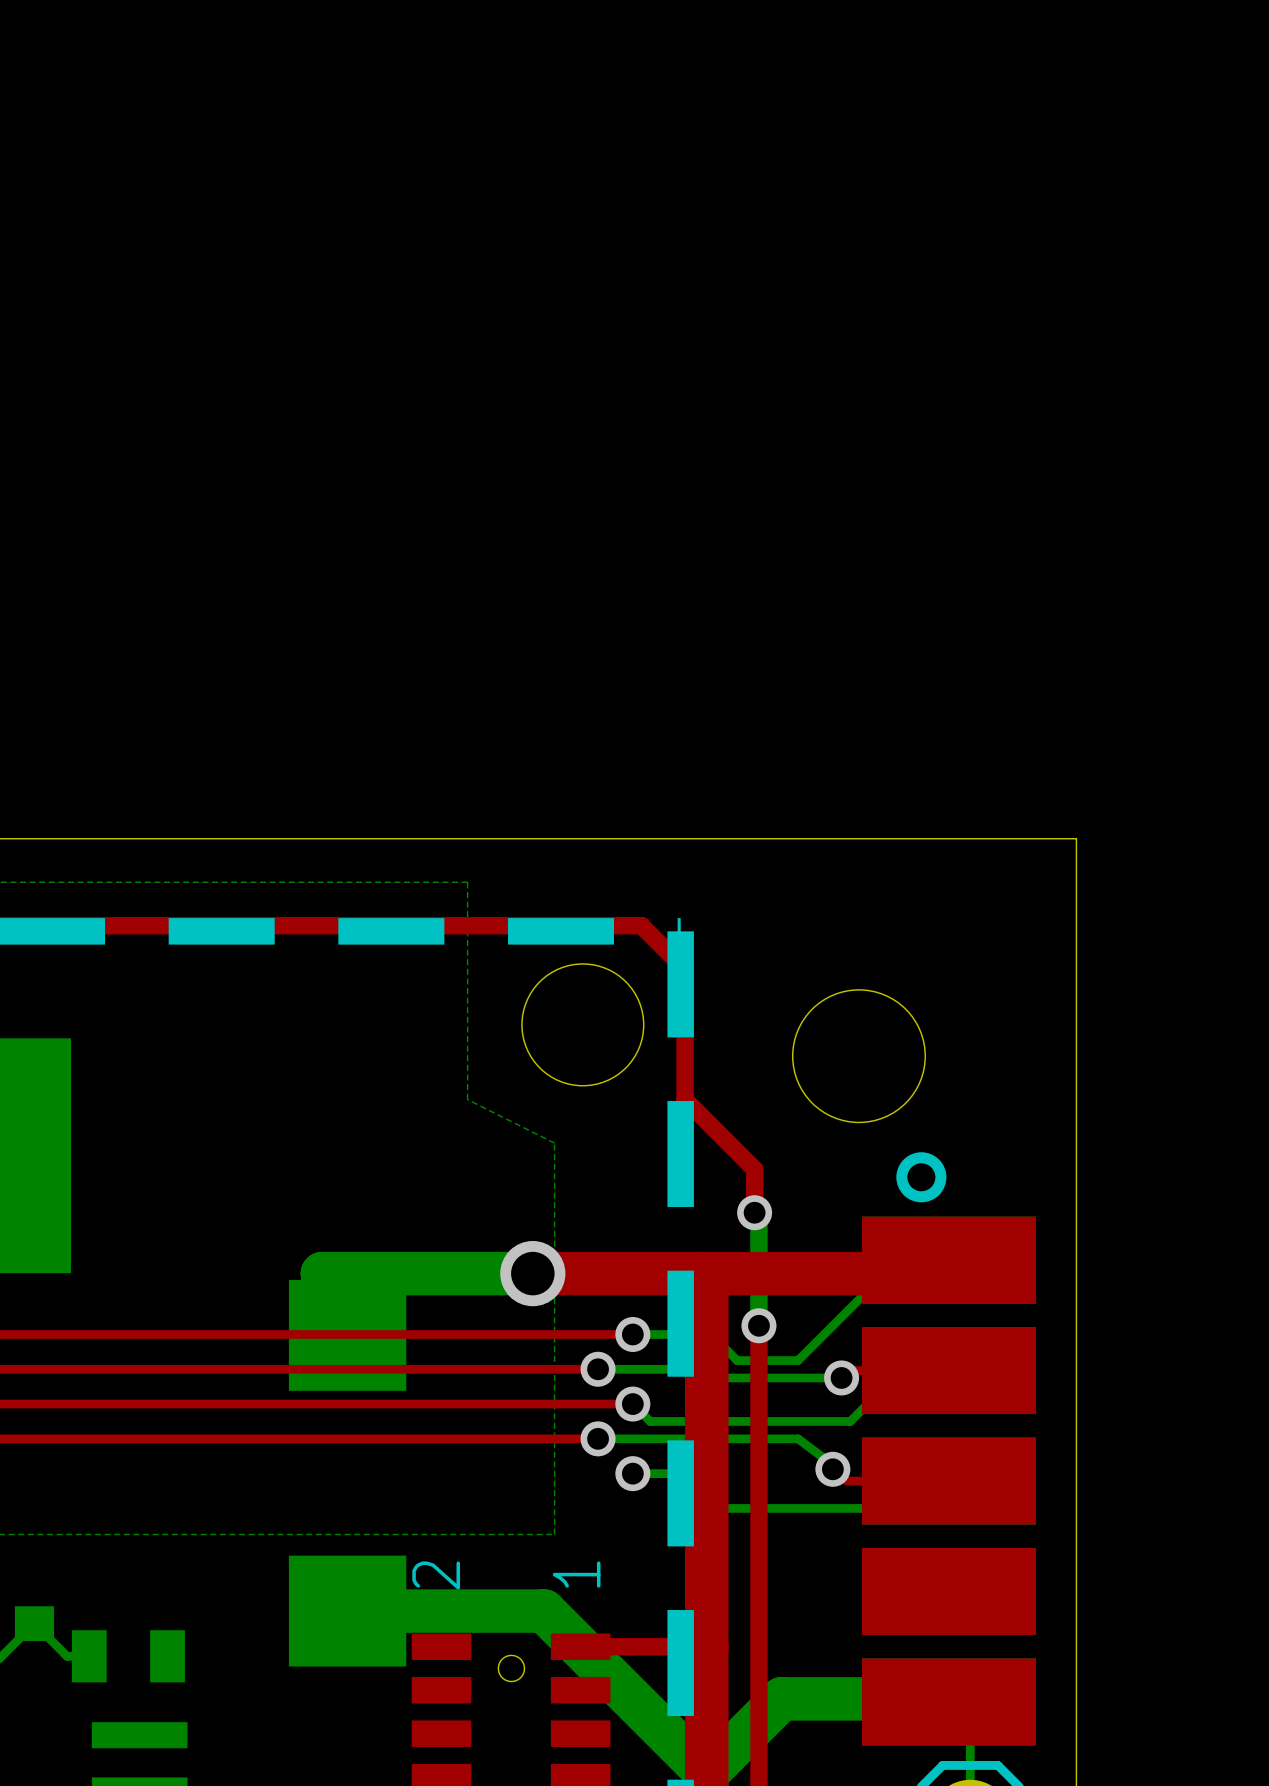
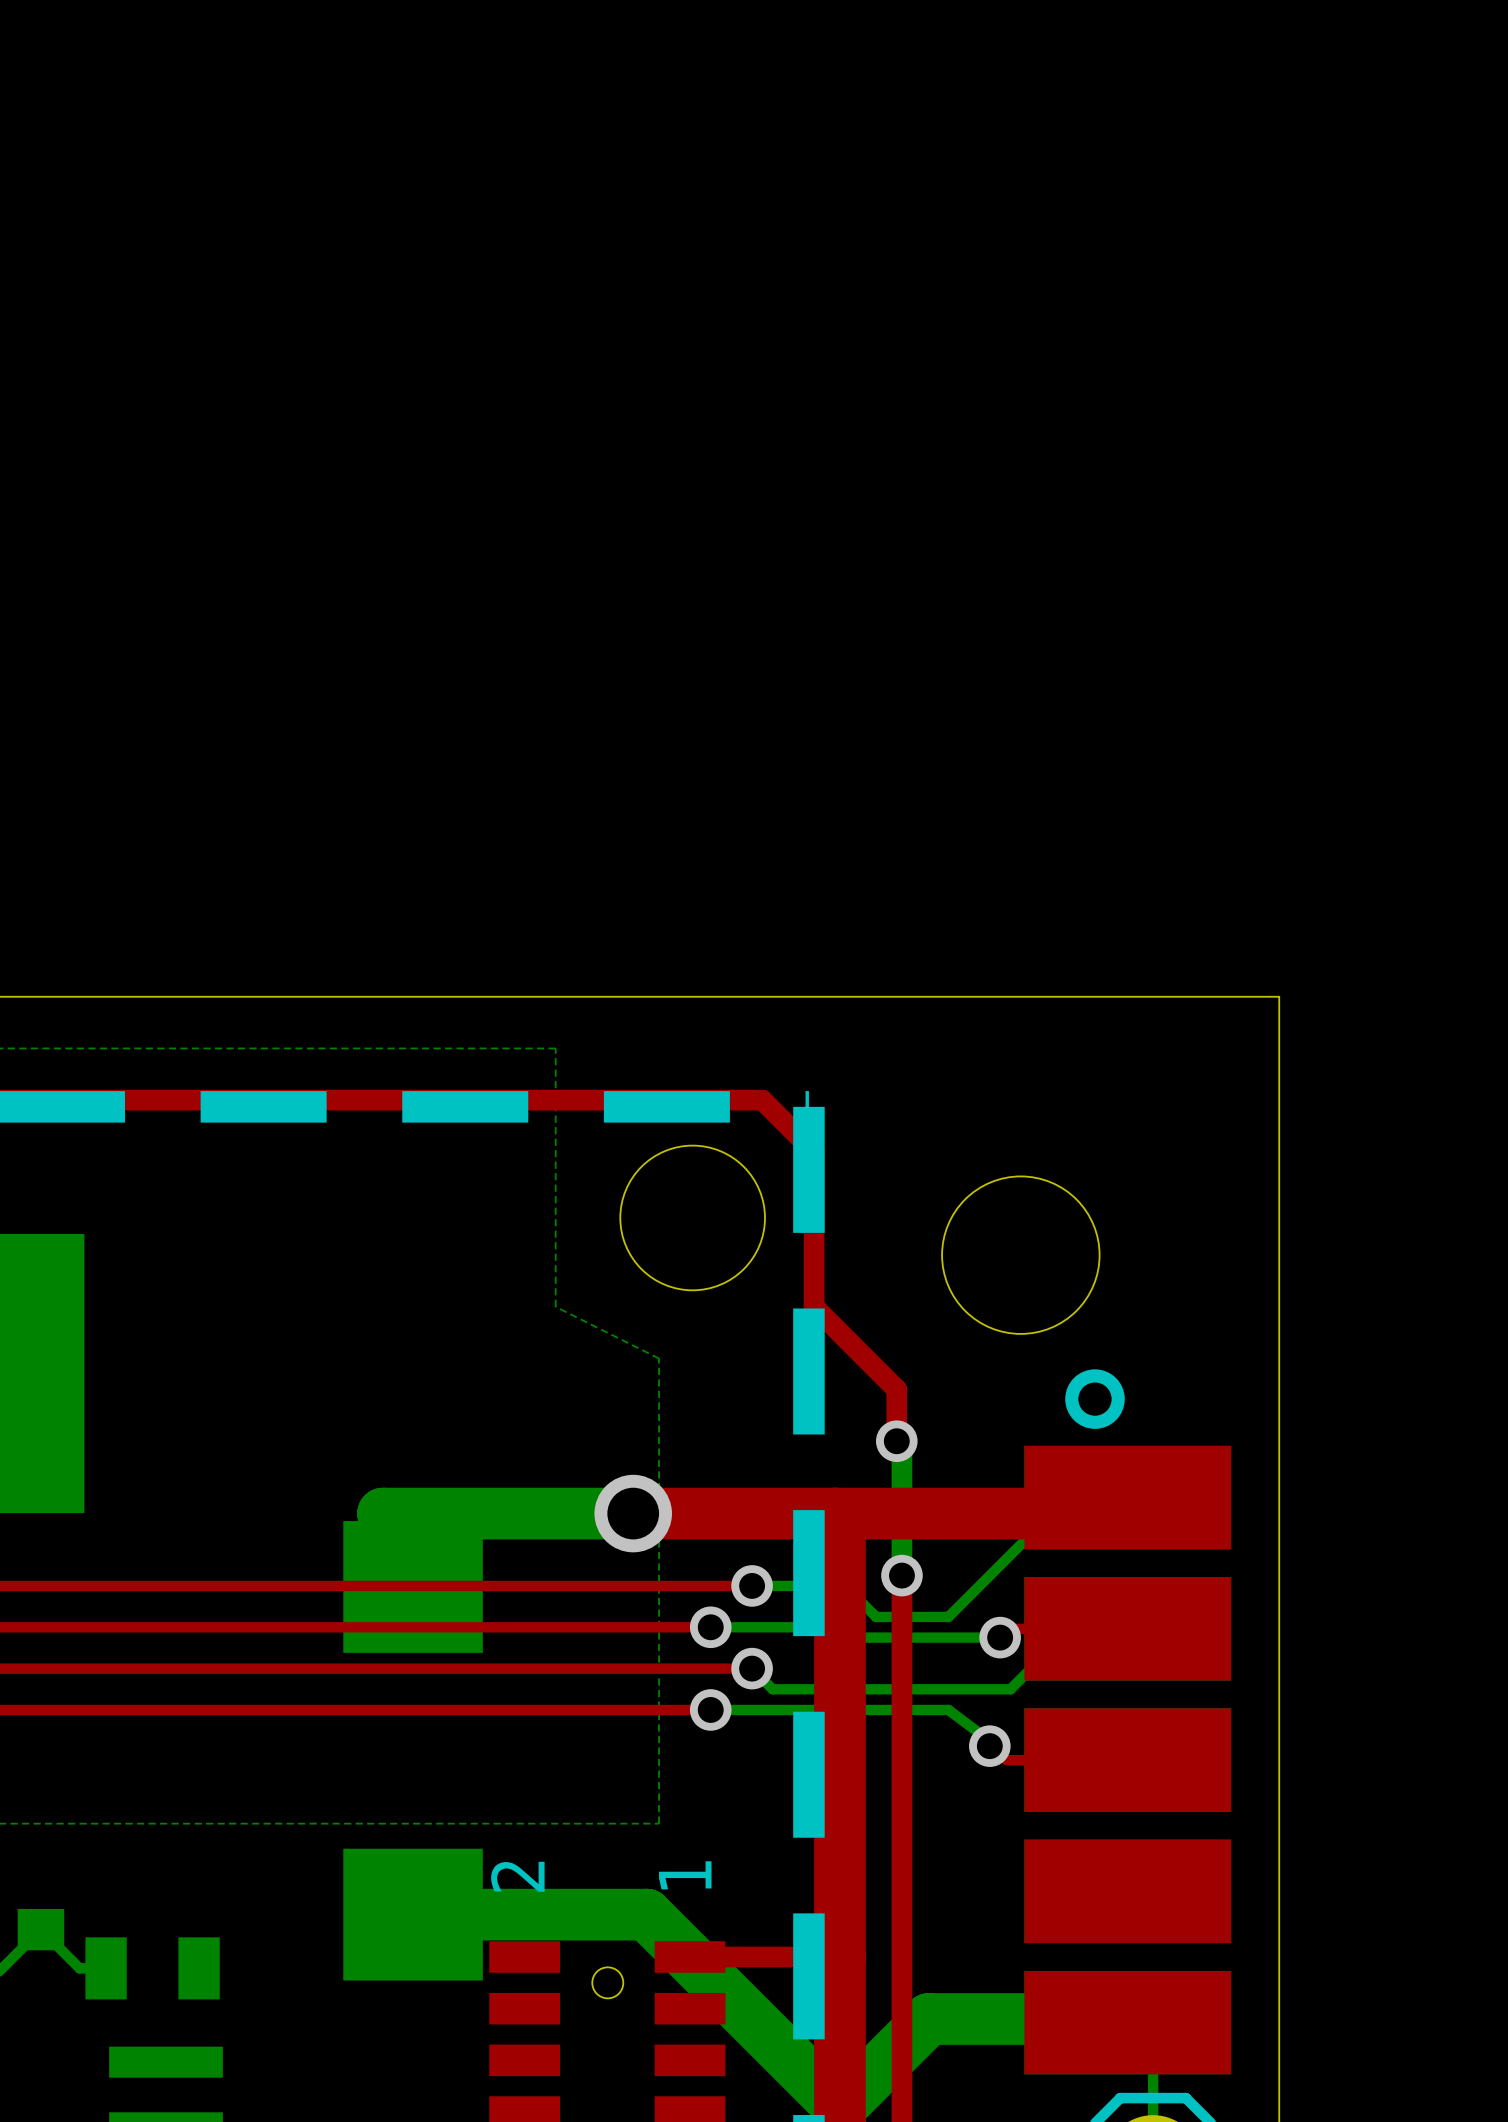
bottom track: (632, 1473) (685, 1473) (719, 1508) (863, 1508) (890, 1481) (948, 1481) -> none
via: (632, 1473) -> none

